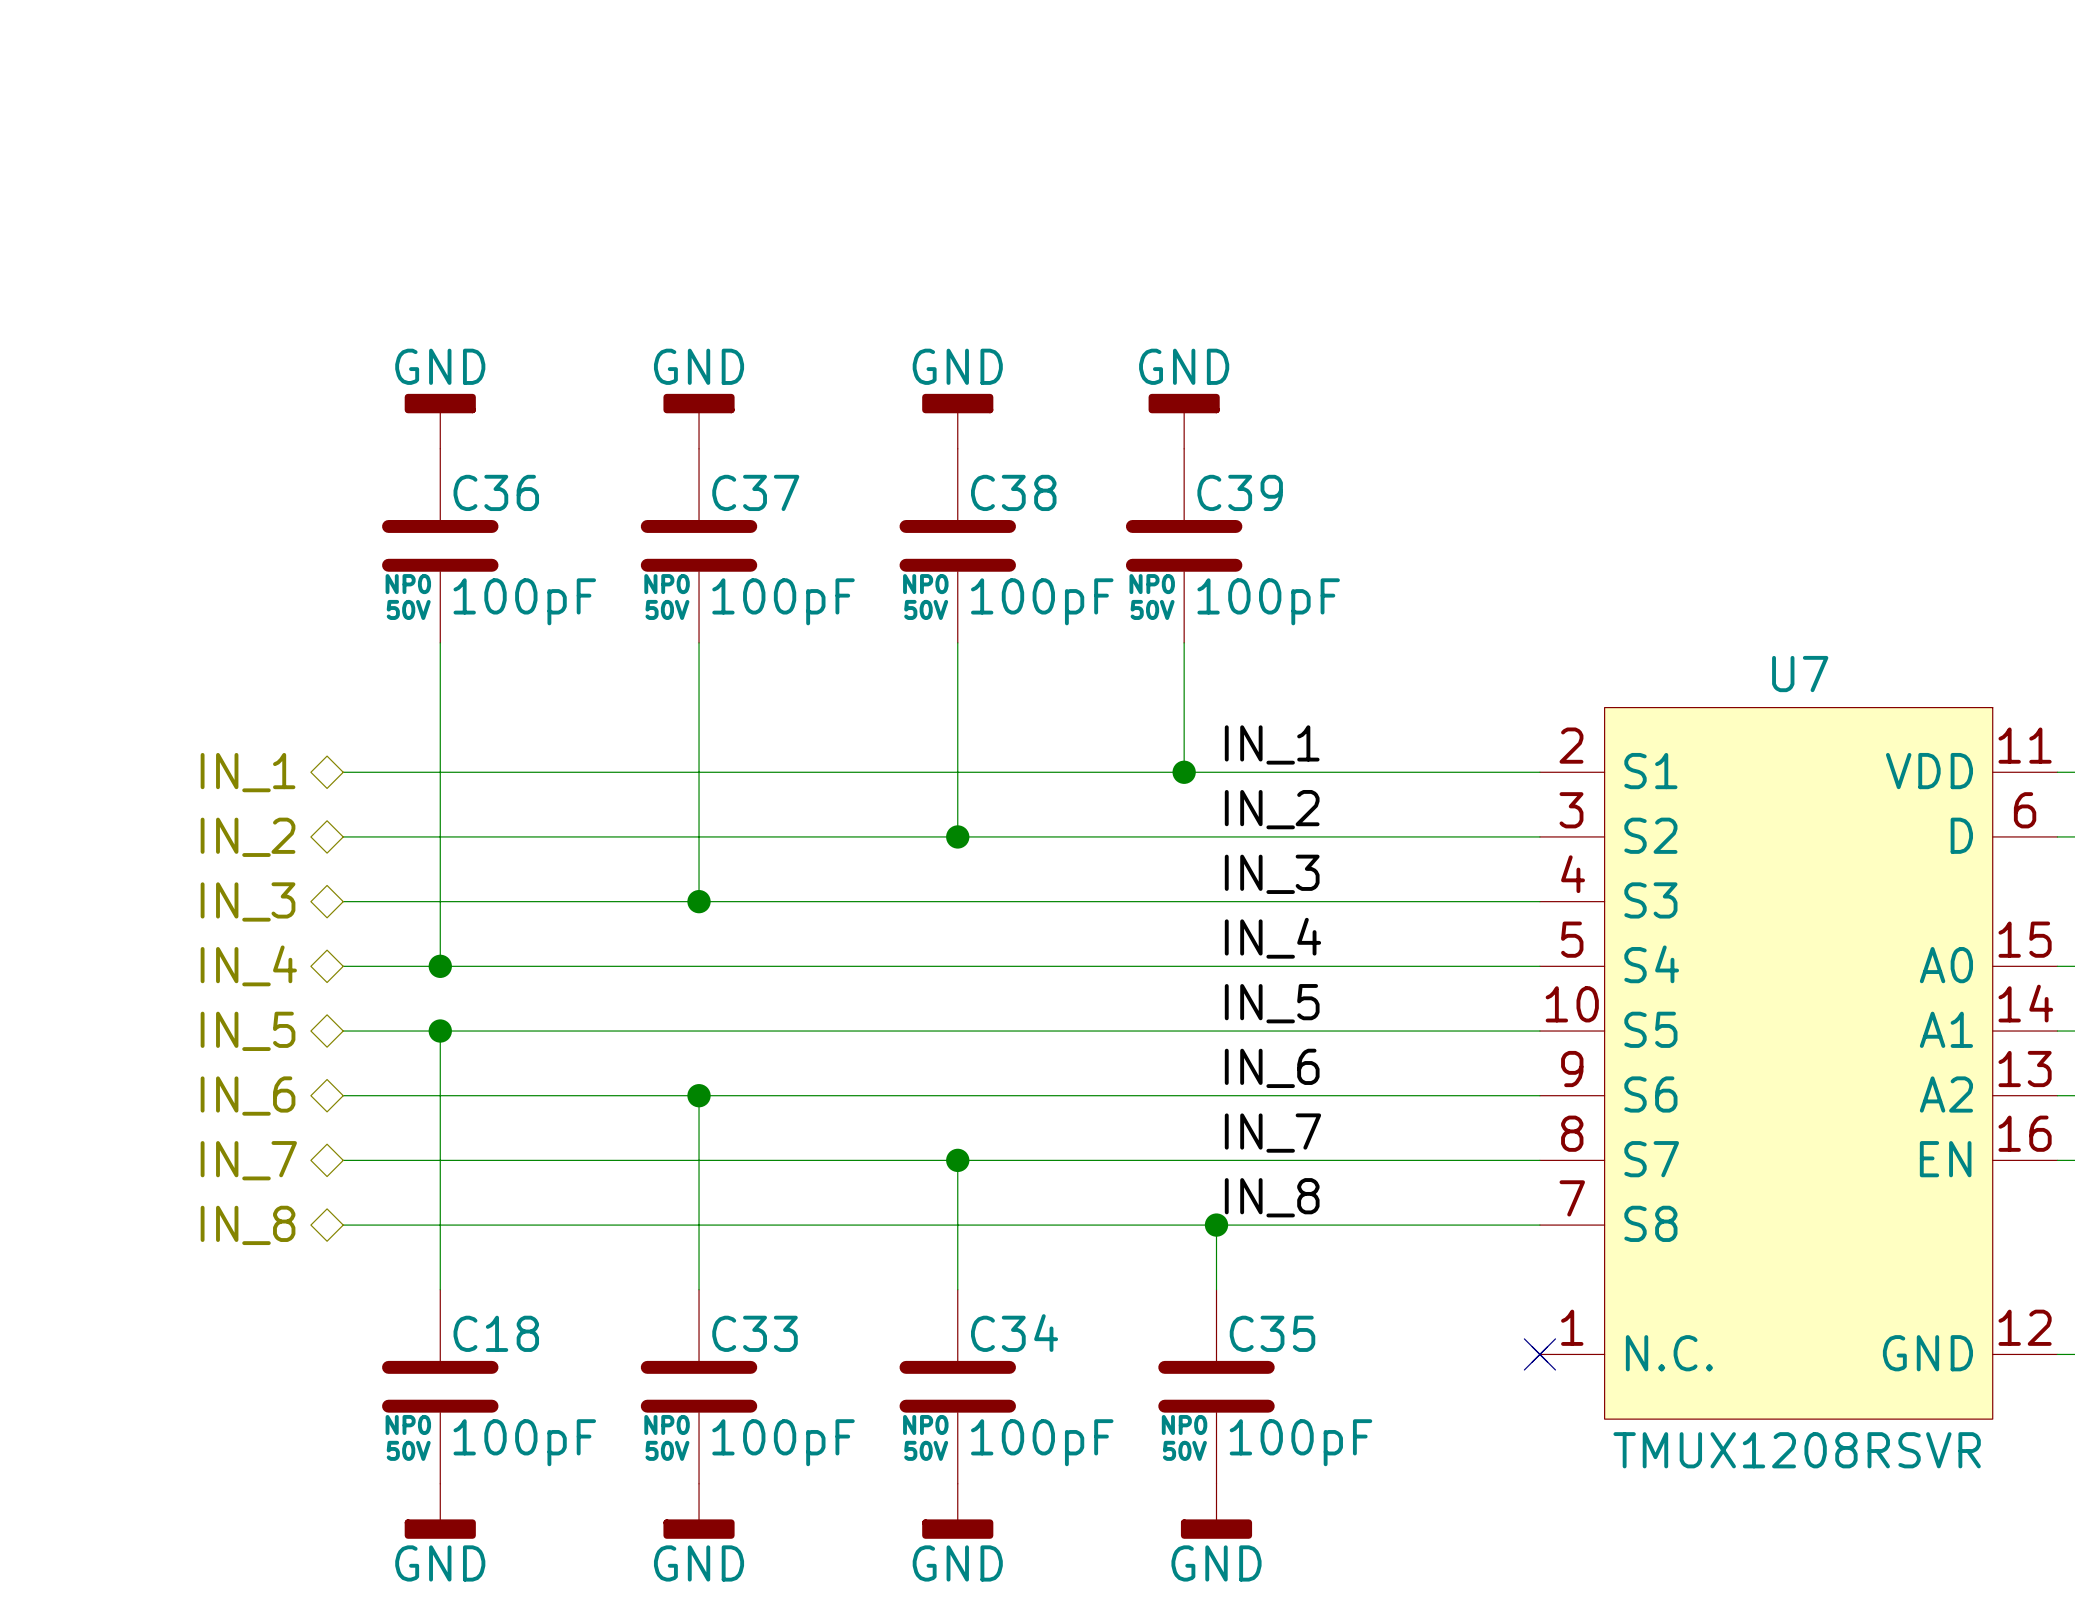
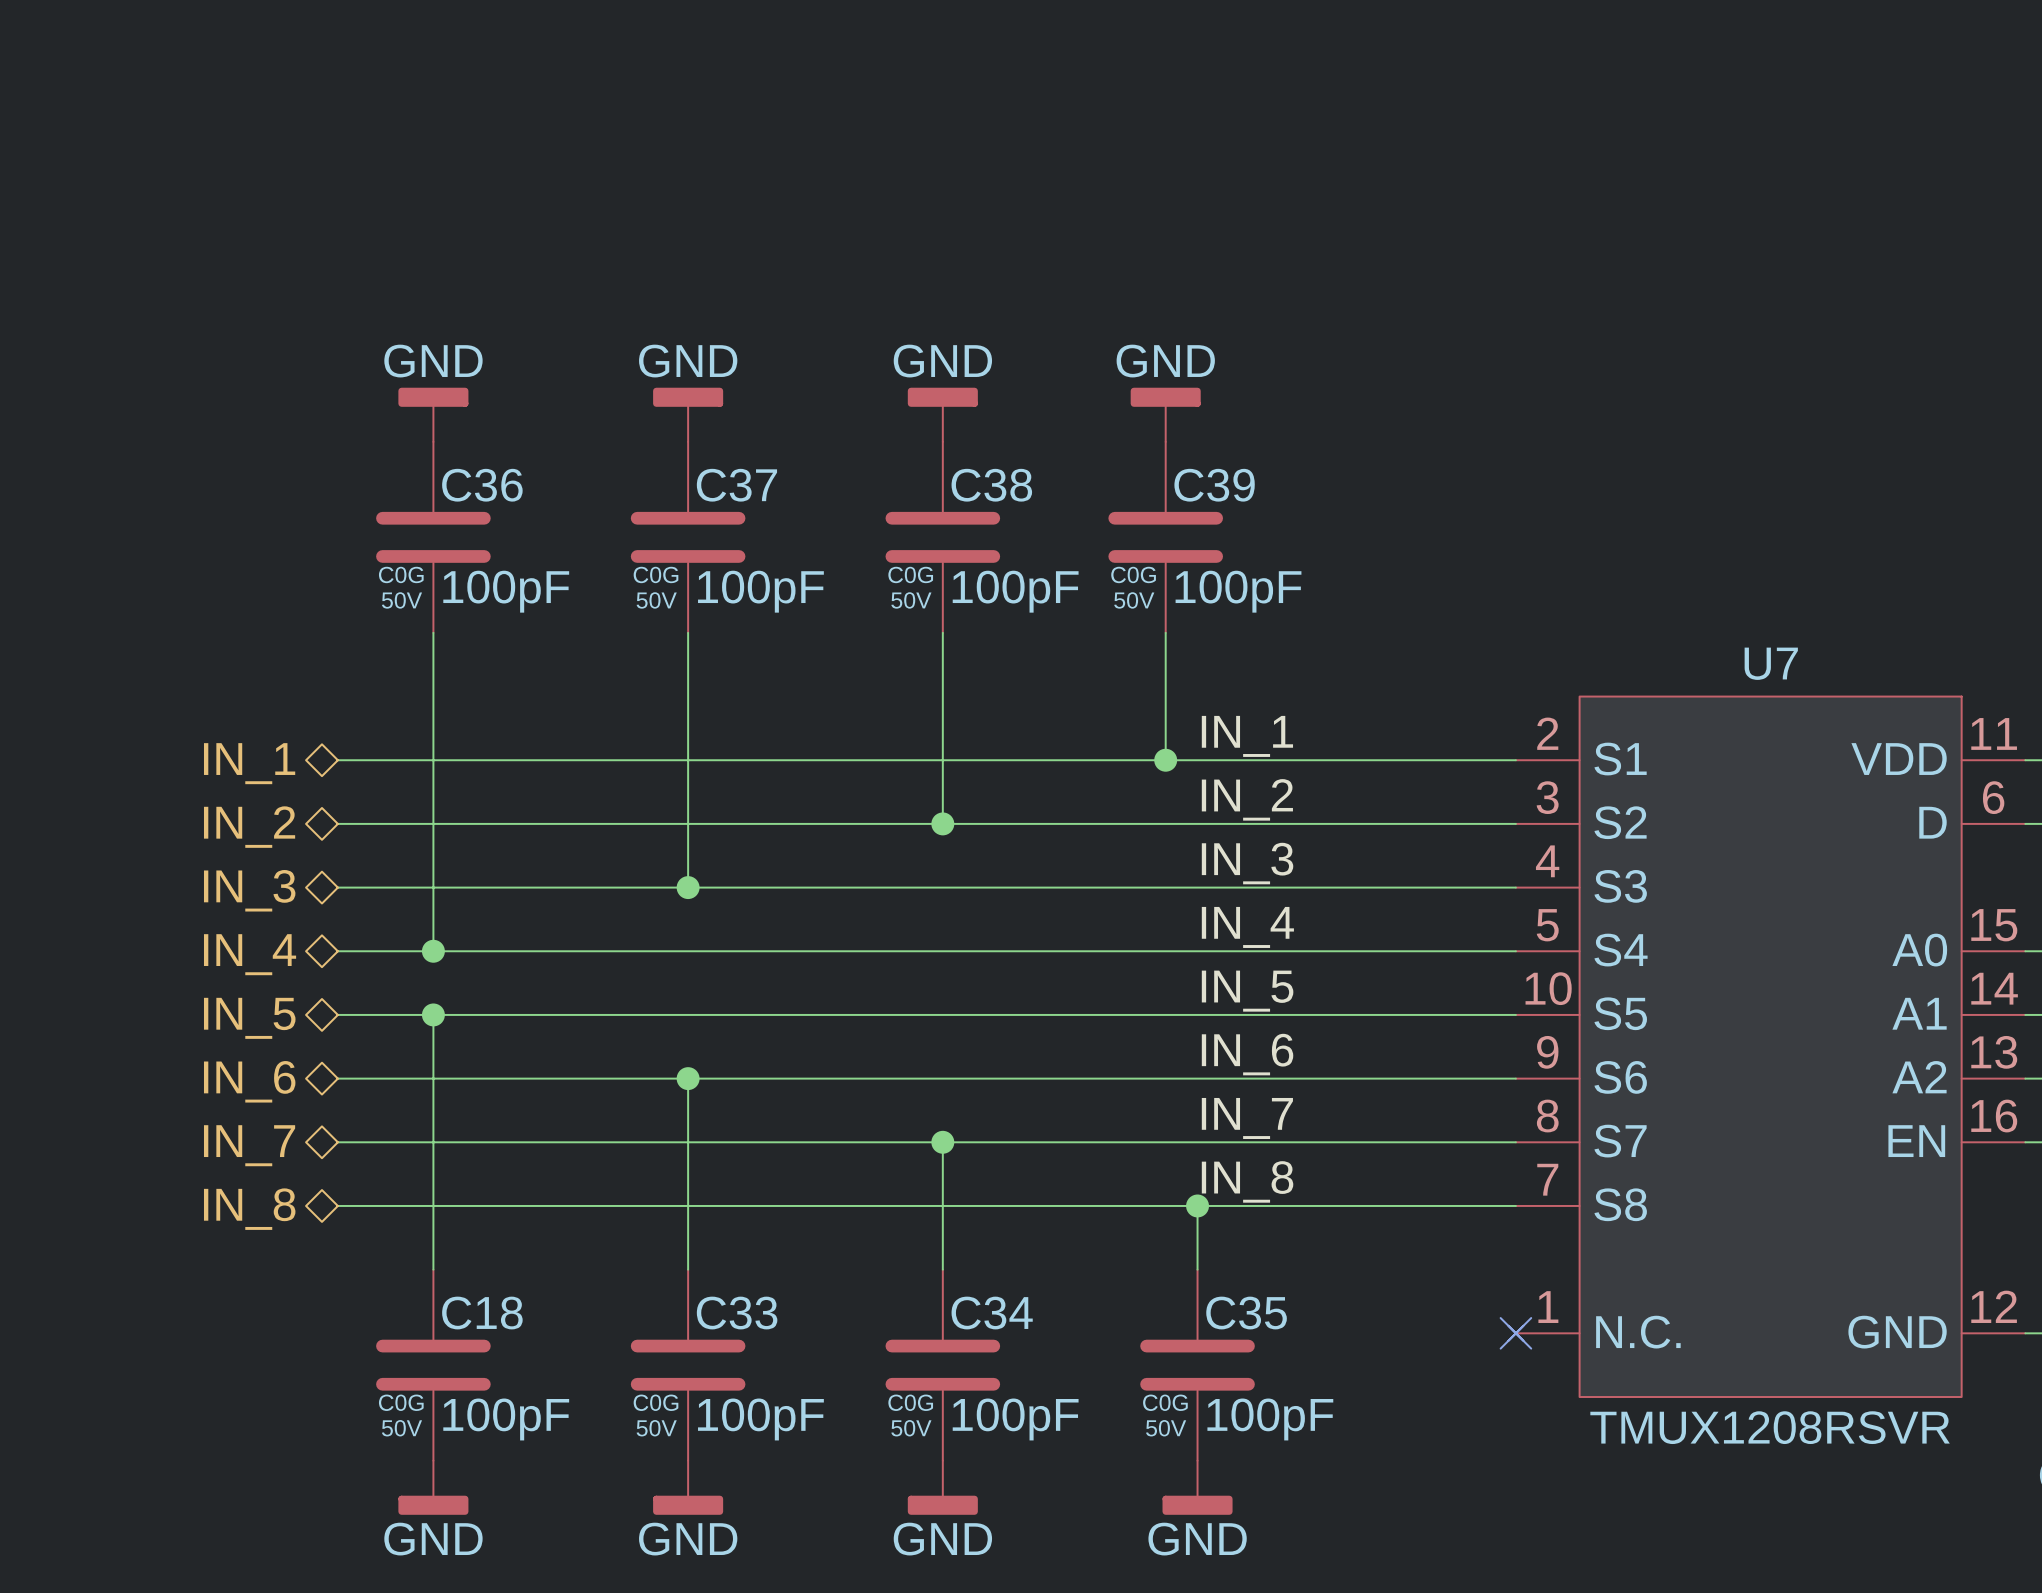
C36 text: NP0 (408, 584) -> C0G (401, 574)
C37 text: NP0 (667, 584) -> C0G (656, 574)
C38 text: NP0 (925, 584) -> C0G (910, 574)
C39 text: NP0 (1152, 584) -> C0G (1133, 574)
C18 text: NP0 (408, 1424) -> C0G (401, 1402)
C33 text: NP0 (667, 1424) -> C0G (656, 1402)
C34 text: NP0 (925, 1424) -> C0G (910, 1402)
C35 text: NP0 (1184, 1424) -> C0G (1165, 1402)

